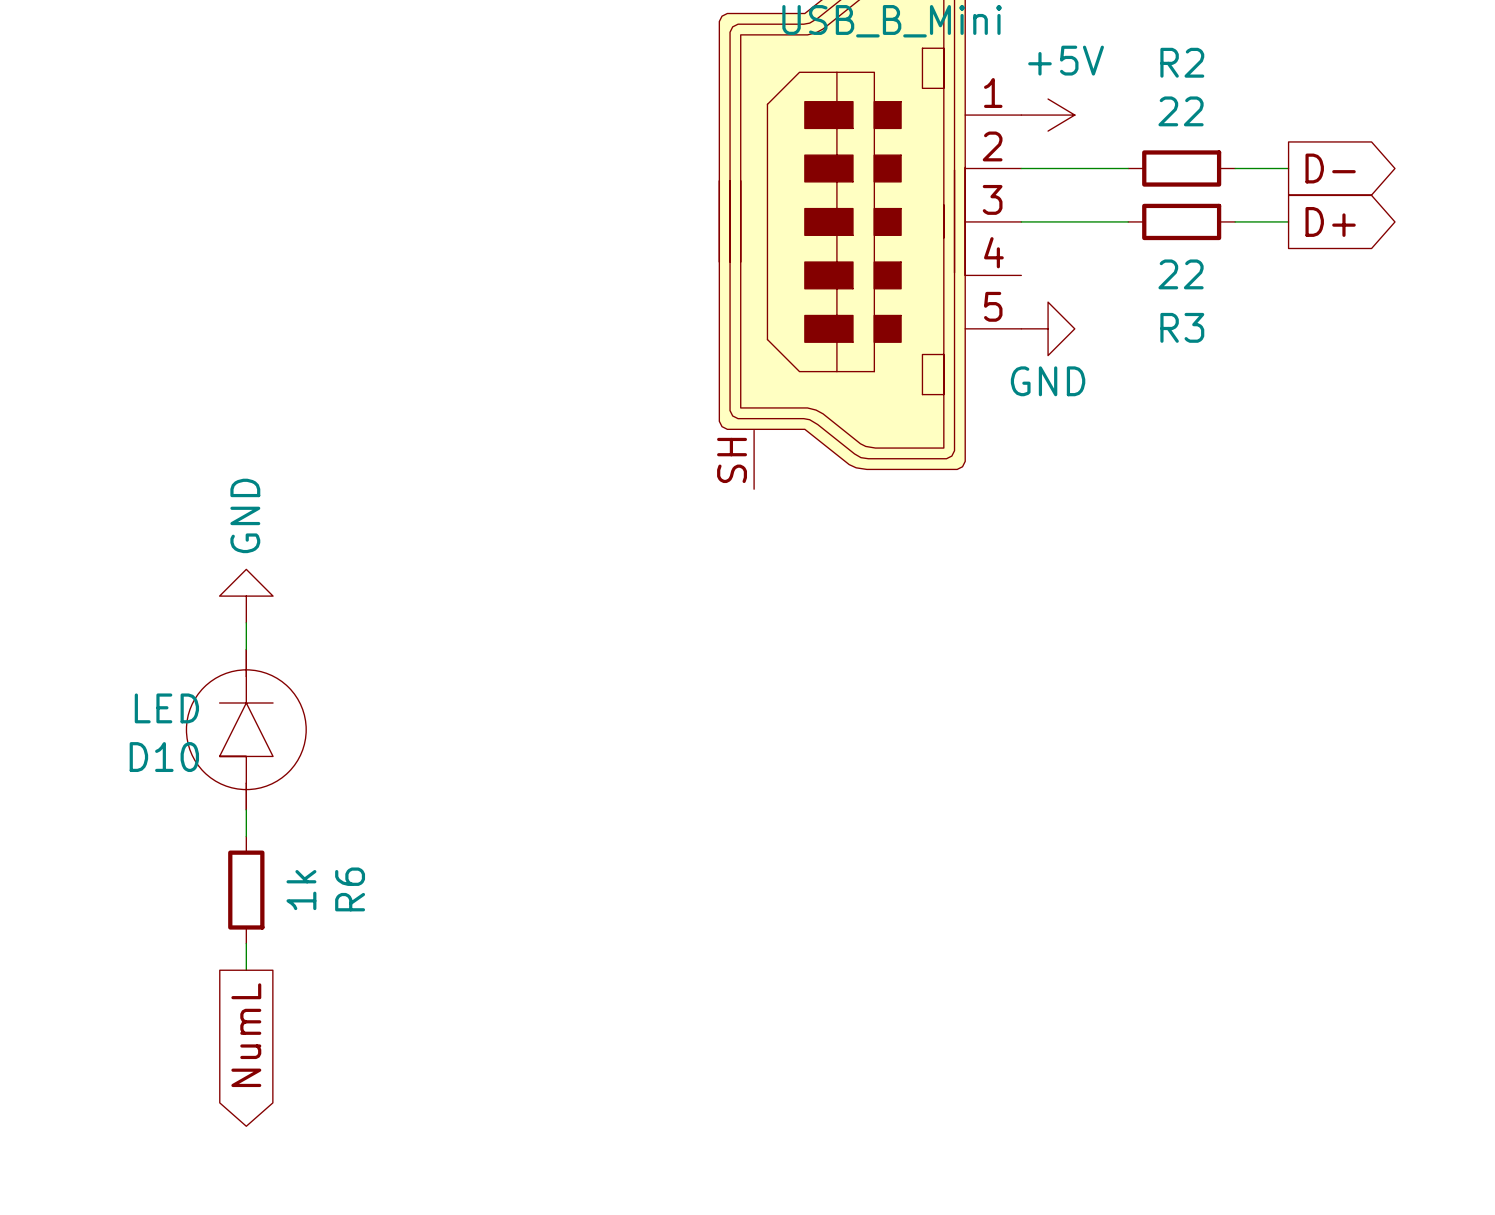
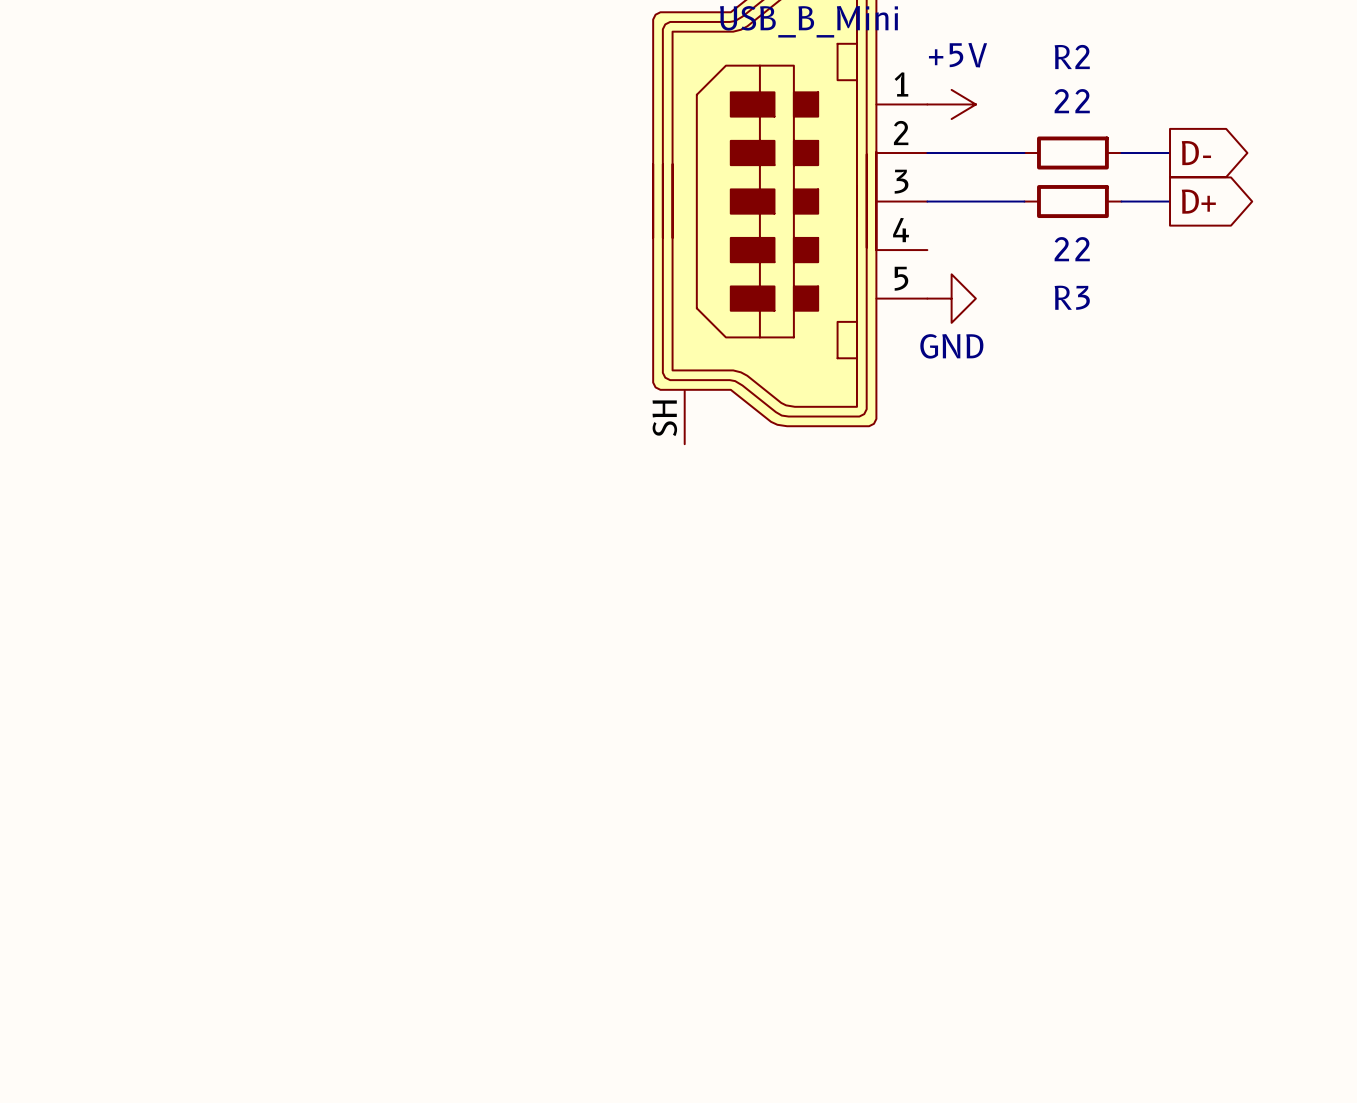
power symbol: GND (246, 596) -> none
wire: (246, 622) (246, 649) -> none
D10: LED (246, 729) -> none
wire: (246, 809) (246, 836) -> none
R6: 1k (246, 890) -> none
wire: (246, 943) (246, 970) -> none
global label: NumL (246, 1035) -> none

